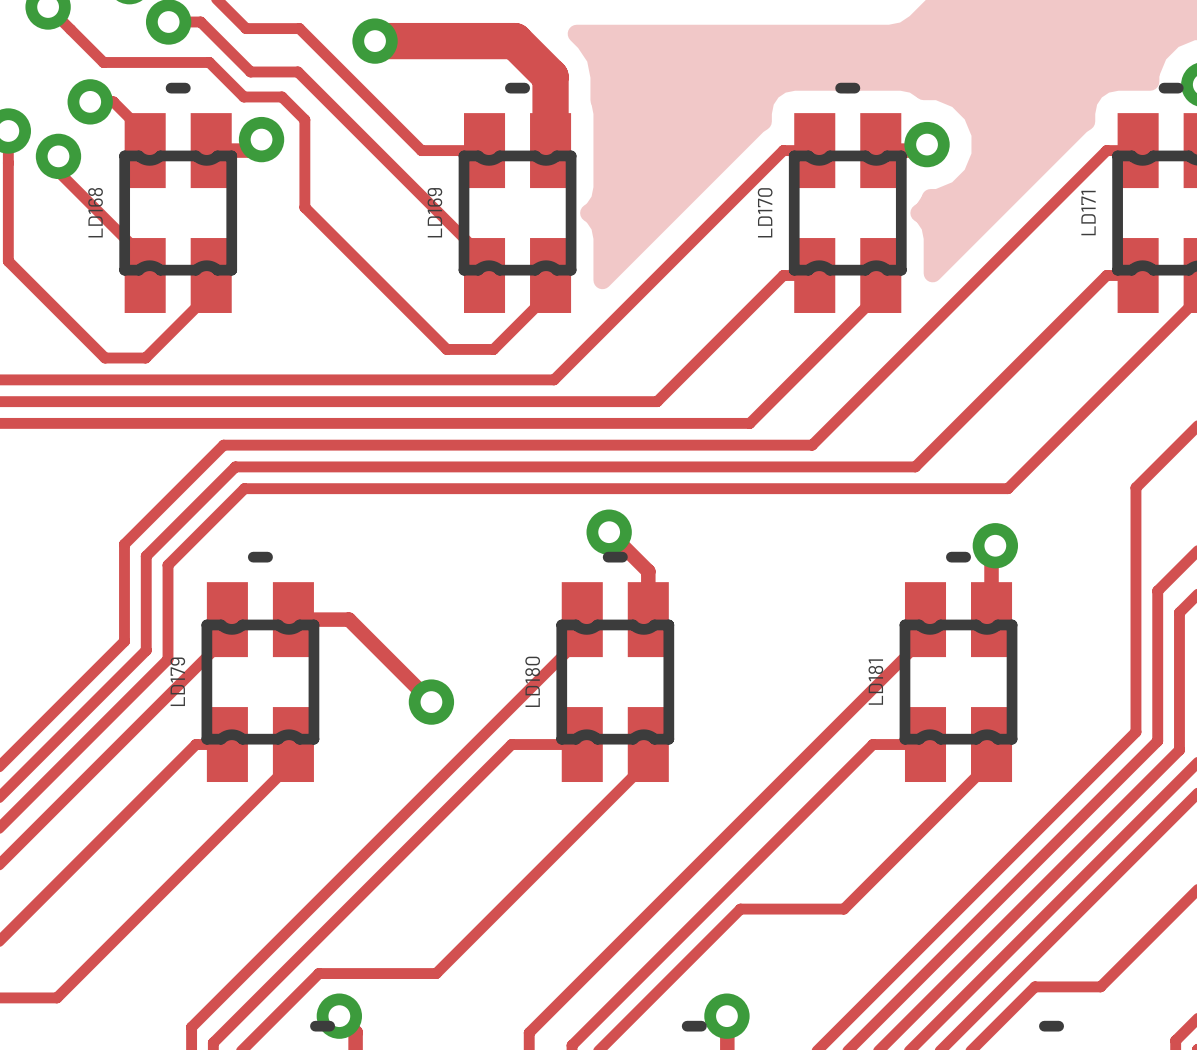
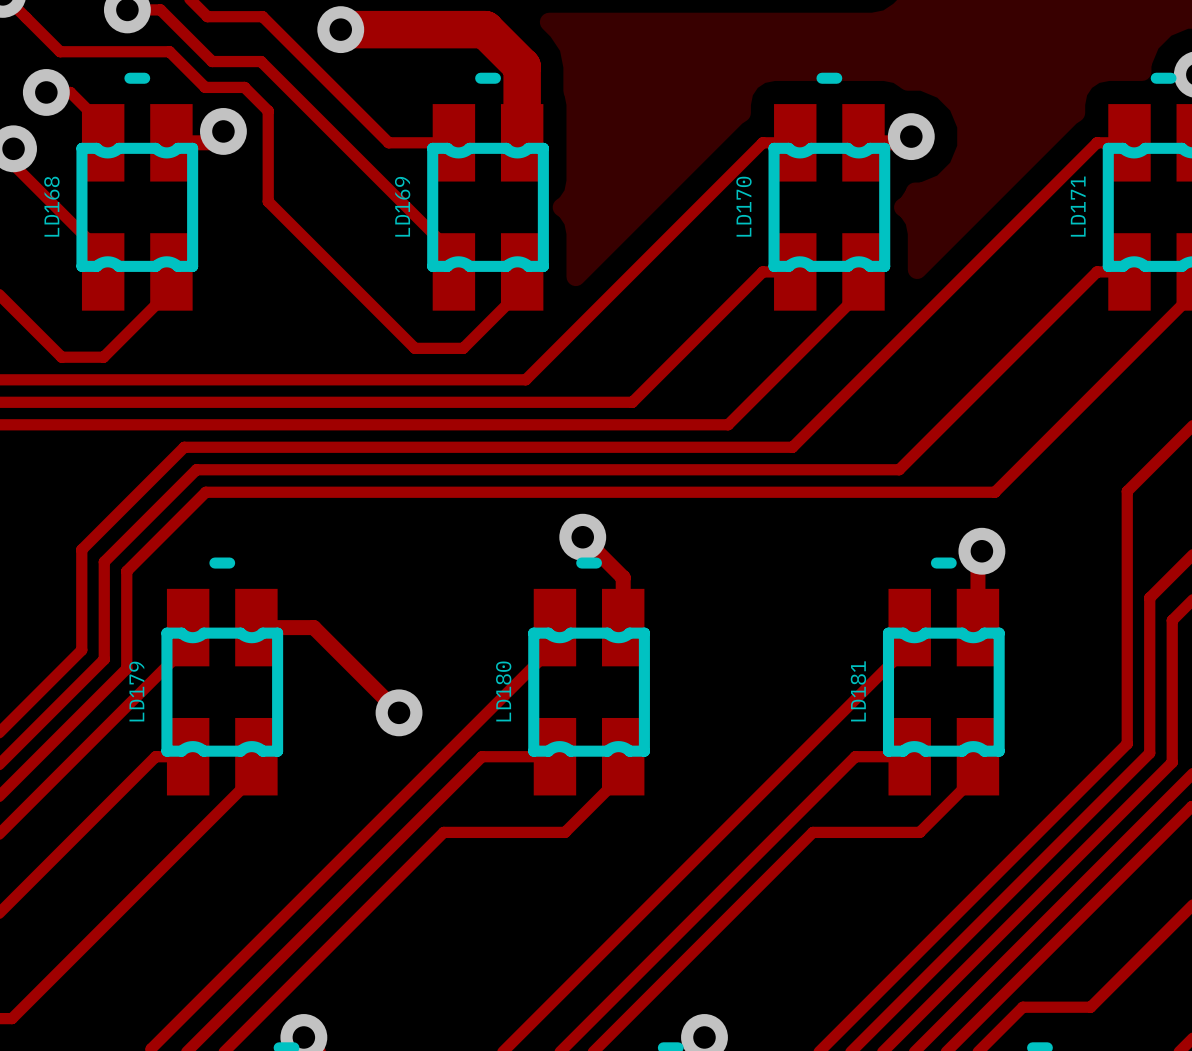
track: (592, 817) (436, 973) (318, 973) -> (565, 832) (443, 832) (282, 993)
track: (935, 817) (843, 909) (740, 909) -> (919, 832) (812, 832) (718, 926)

